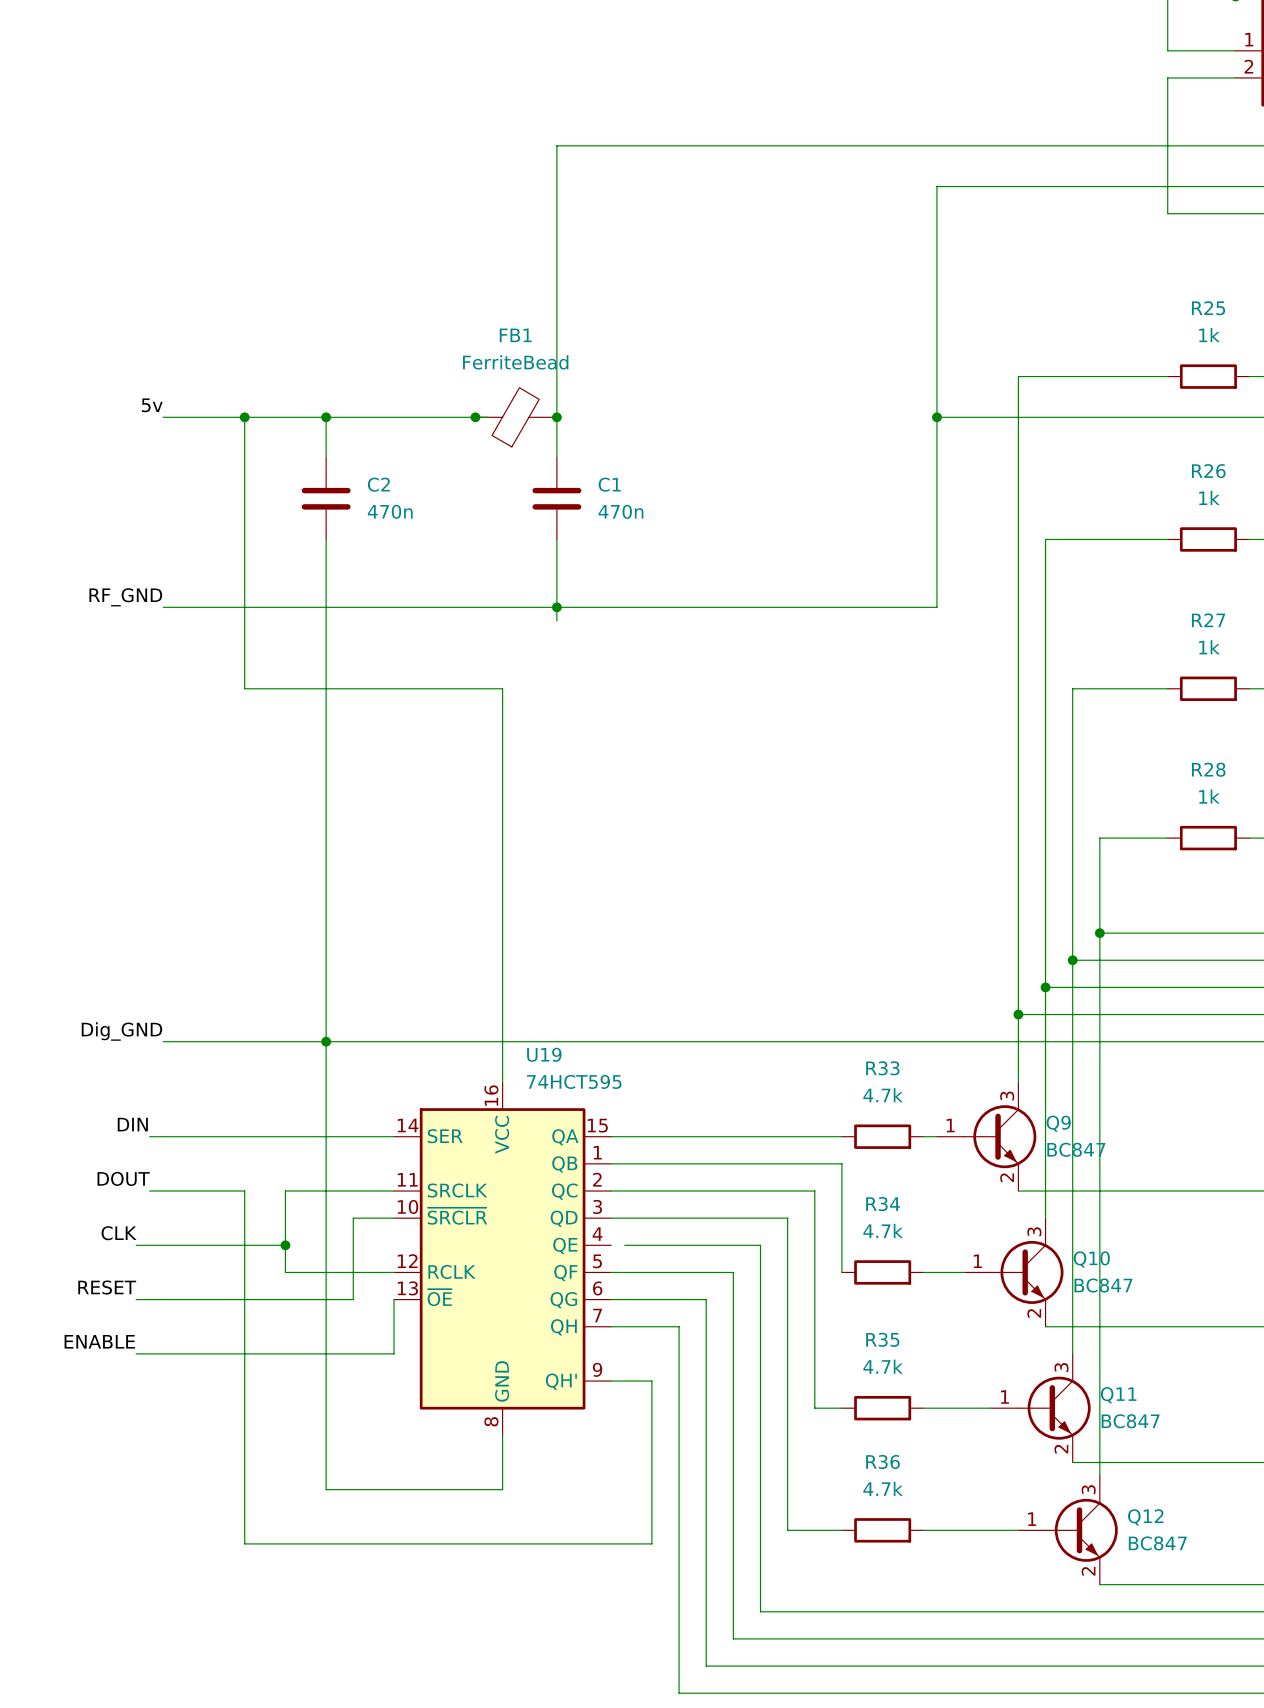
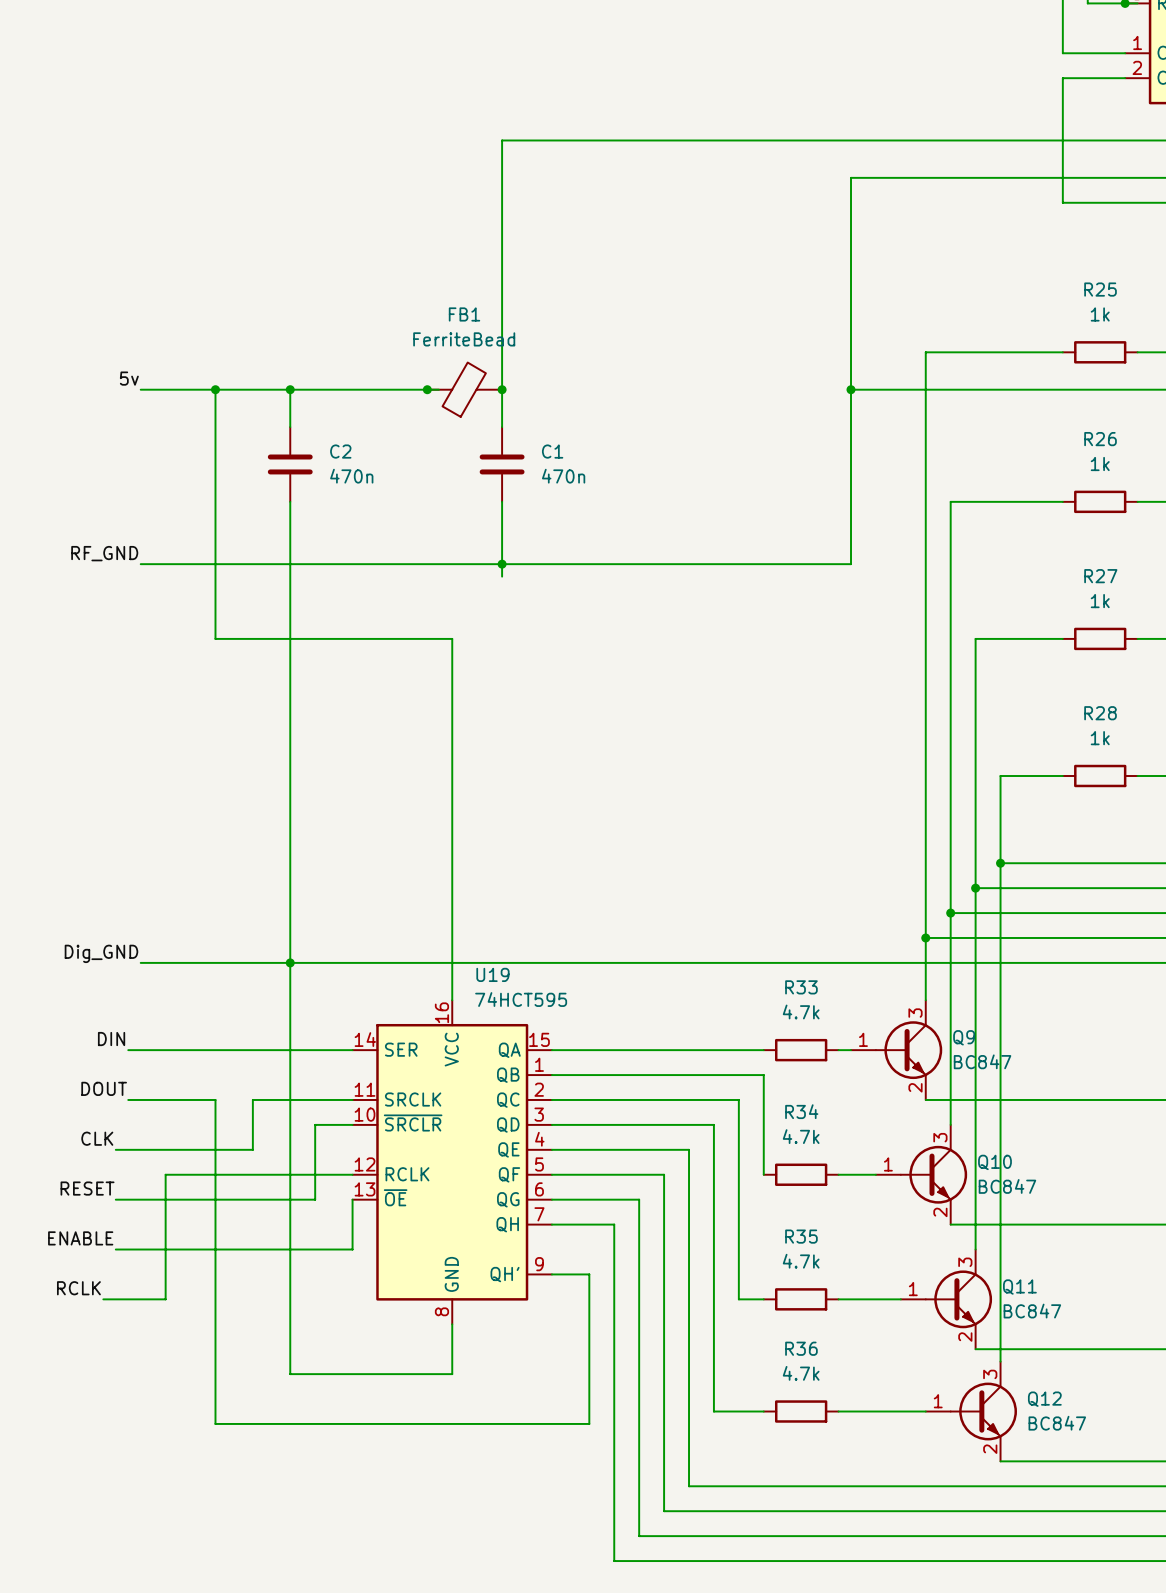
wire: (285, 1245) (285, 1272) -> (103, 1299) (165, 1299) (165, 1174) (252, 1174)
junction: (285, 1245) -> none
wire: none -> (551, 1149) (564, 1149)
label: none -> RCLK (78, 1288)

